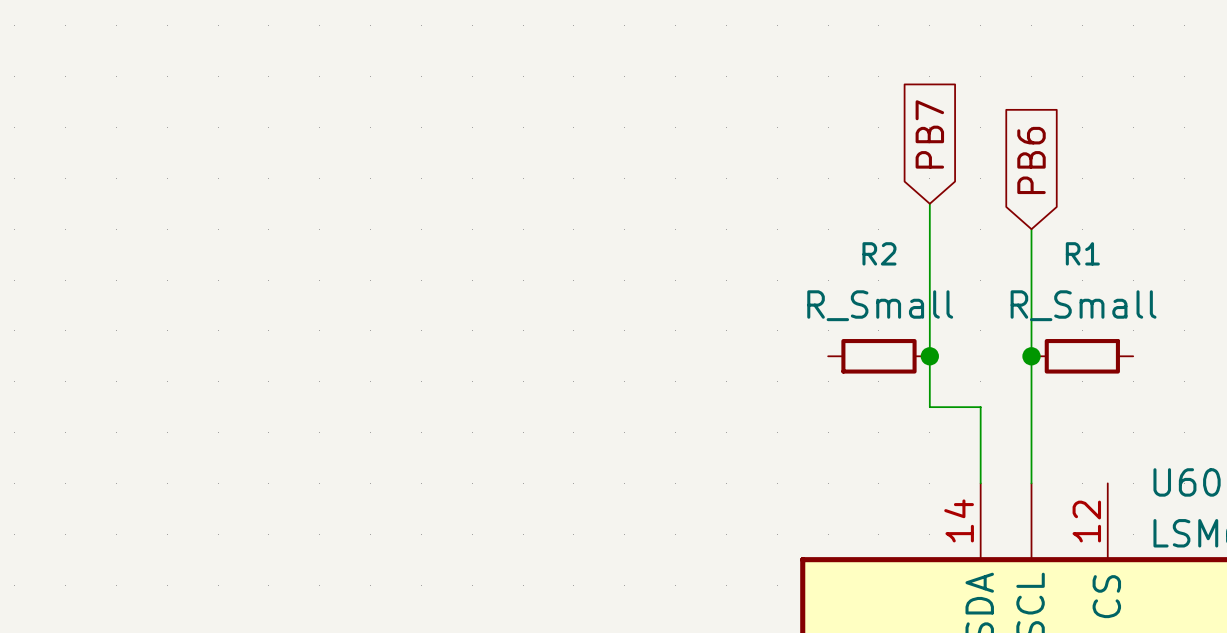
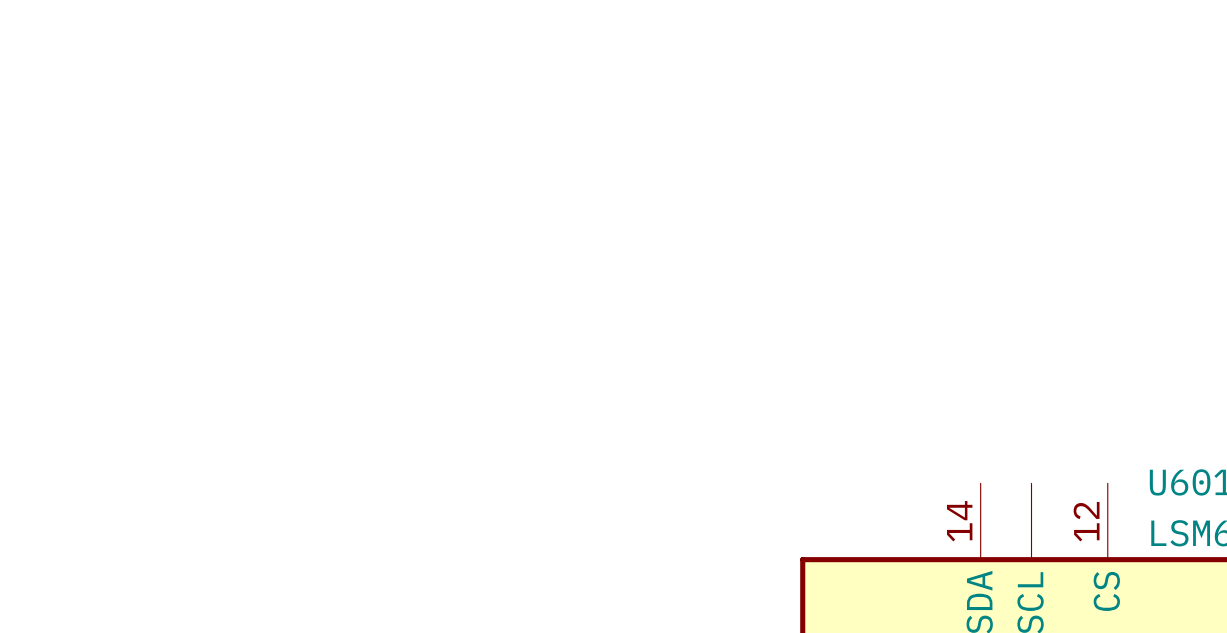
global label: PB7 (929, 134) -> none
global label: PB6 (1031, 160) -> none
wire: (929, 203) (929, 407) (980, 407) (980, 483) -> none
wire: (1031, 229) (1031, 483) -> none
R2: R_Small (878, 356) -> none
junction: (929, 356) -> none
junction: (1031, 356) -> none
R1: R_Small (1082, 356) -> none

